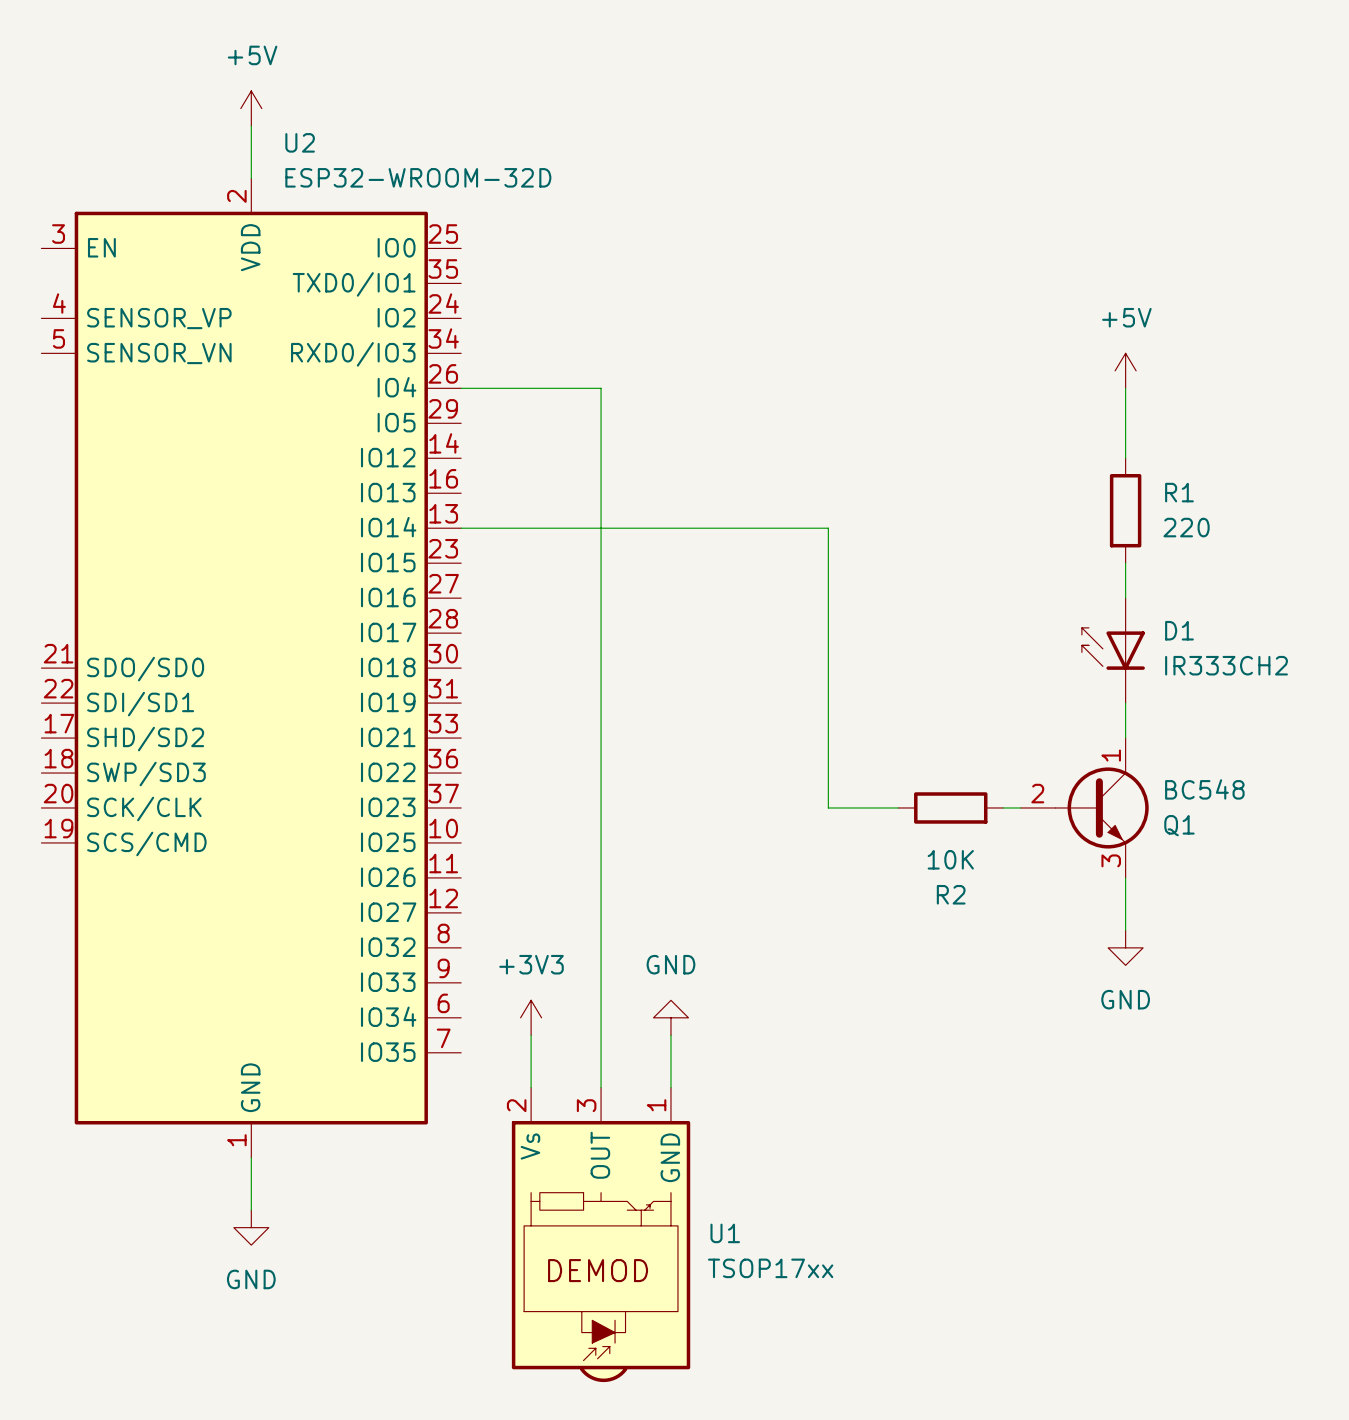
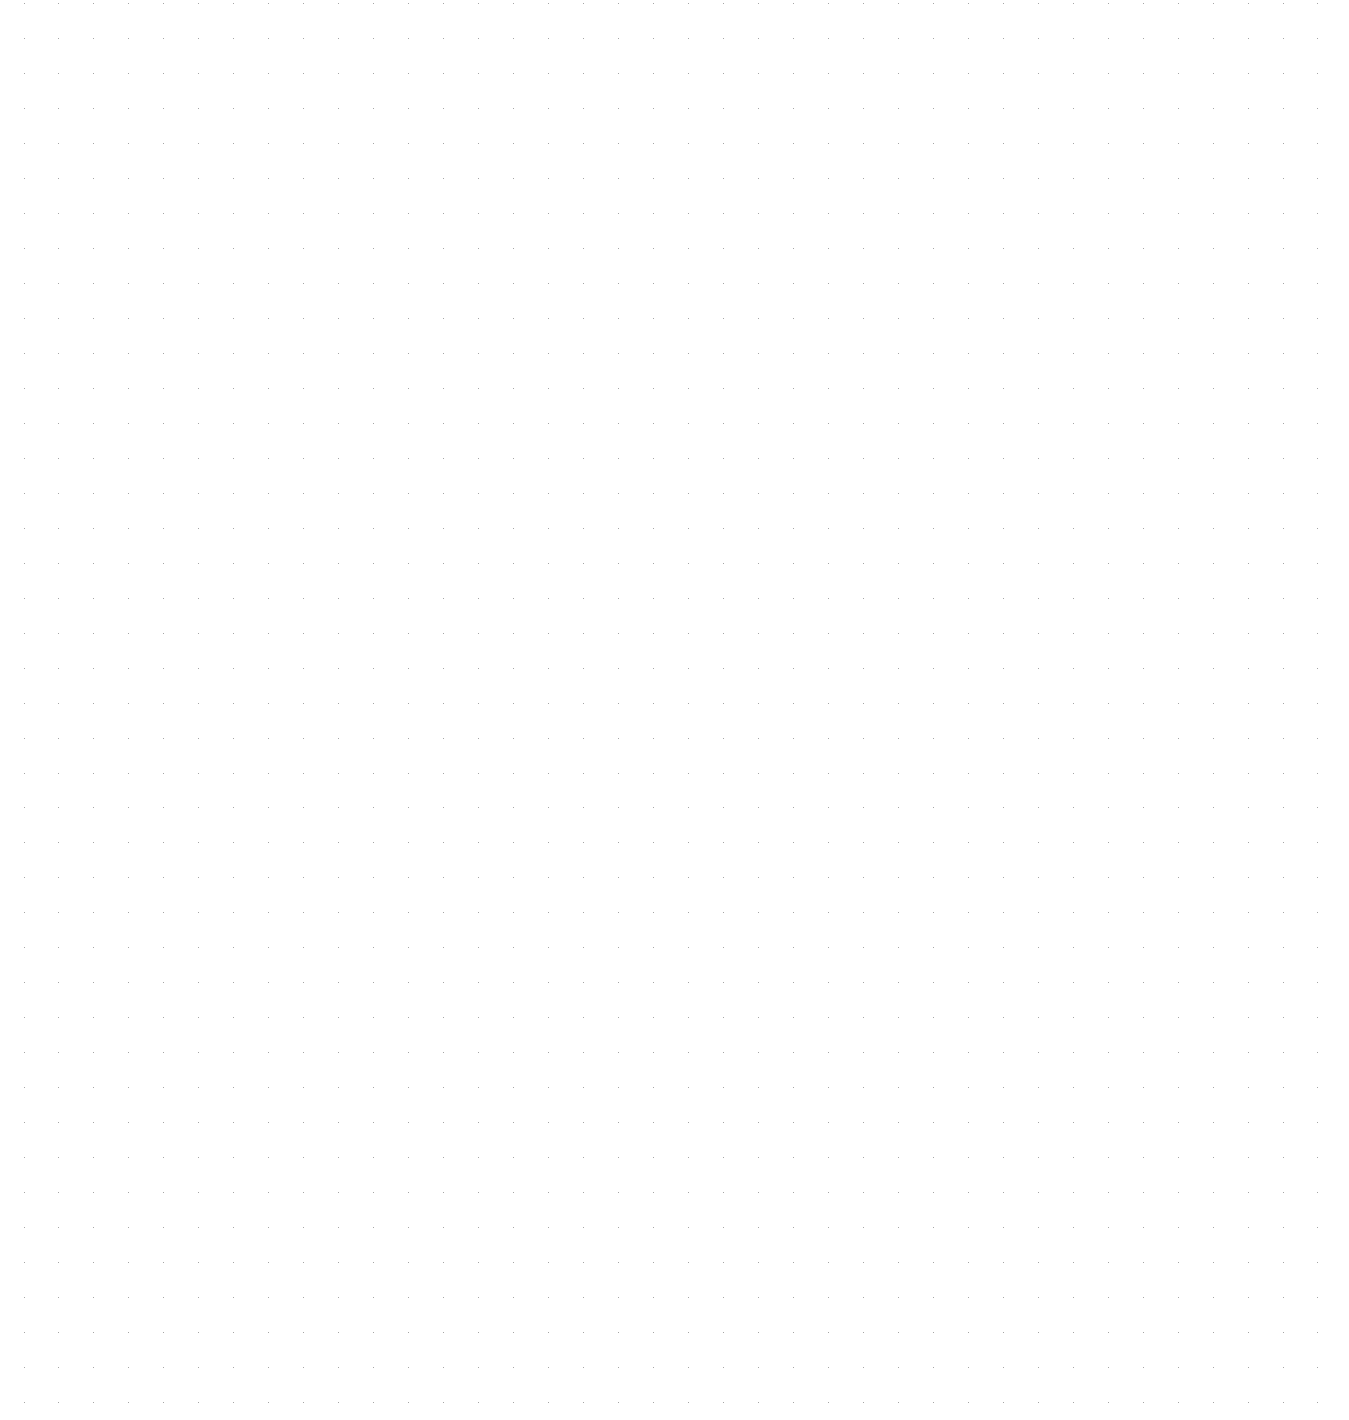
power symbol: +5V (251, 108) -> none
wire: (251, 126) (251, 178) -> none
power symbol: +5V (1125, 370) -> none
wire: (461, 388) (601, 388) (601, 1087) -> none
wire: (1125, 388) (1125, 458) -> none
R1: 220 (1125, 510) -> none
wire: (461, 528) (828, 528) (828, 807) (898, 807) -> none
wire: (1125, 563) (1125, 598) -> none
D1: IR333CH2 (1113, 650) -> none
U2: ESP32-WROOM-32D (251, 668) -> none
wire: (1125, 703) (1125, 738) -> none
R2: 10K (950, 807) -> none
wire: (1003, 807) (1020, 807) -> none
Q1: BC548 (1084, 807) -> none
wire: (1125, 877) (1125, 930) -> none
power symbol: GND (1125, 947) -> none
power symbol: +3V3 (531, 1017) -> none
power symbol: GND (670, 1017) -> none
wire: (531, 1035) (531, 1087) -> none
wire: (670, 1035) (670, 1087) -> none
wire: (251, 1157) (251, 1210) -> none
power symbol: GND (251, 1227) -> none
U1: TSOP17xx (601, 1234) -> none

